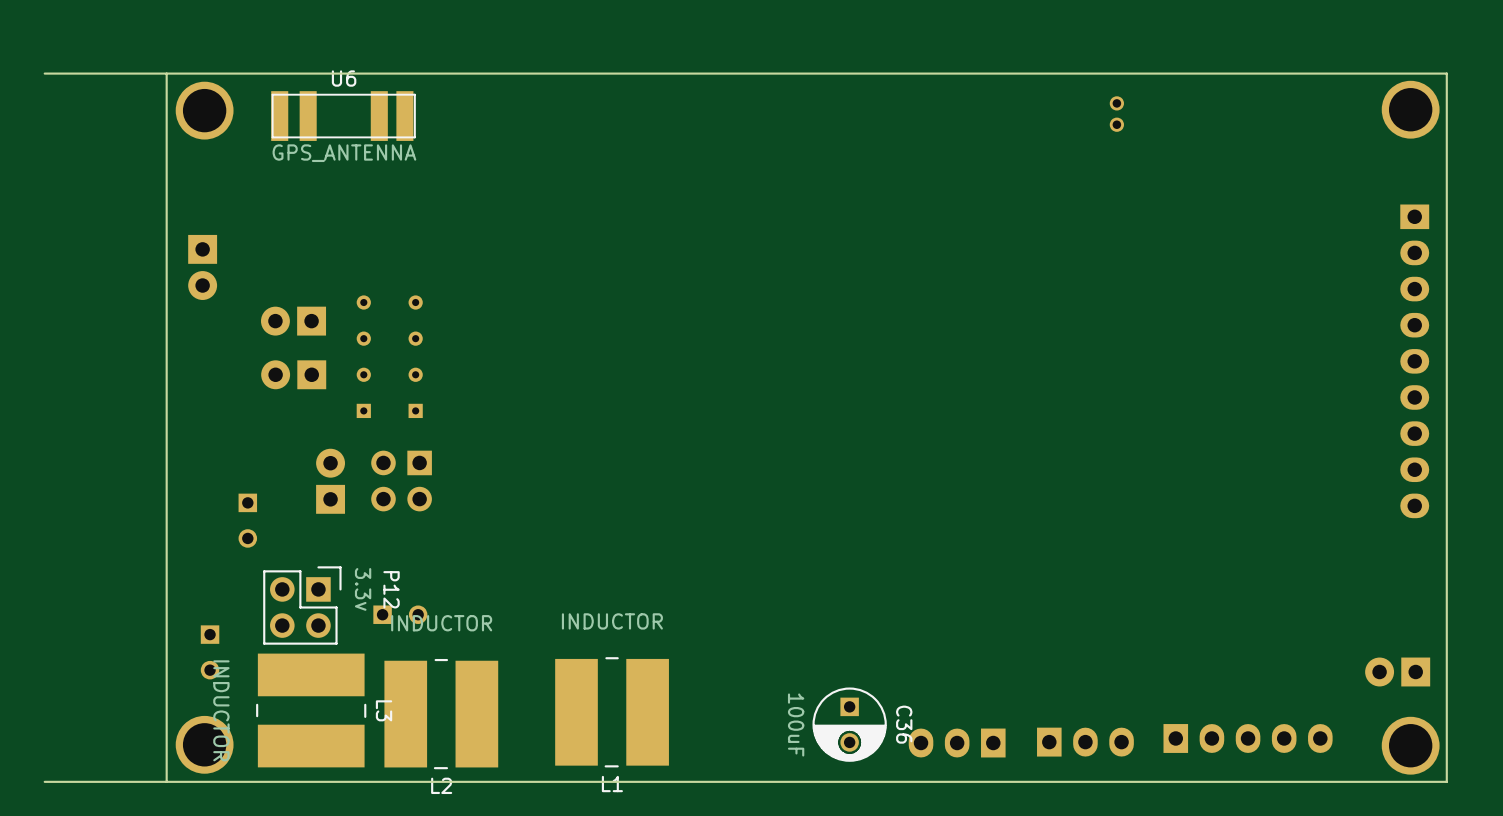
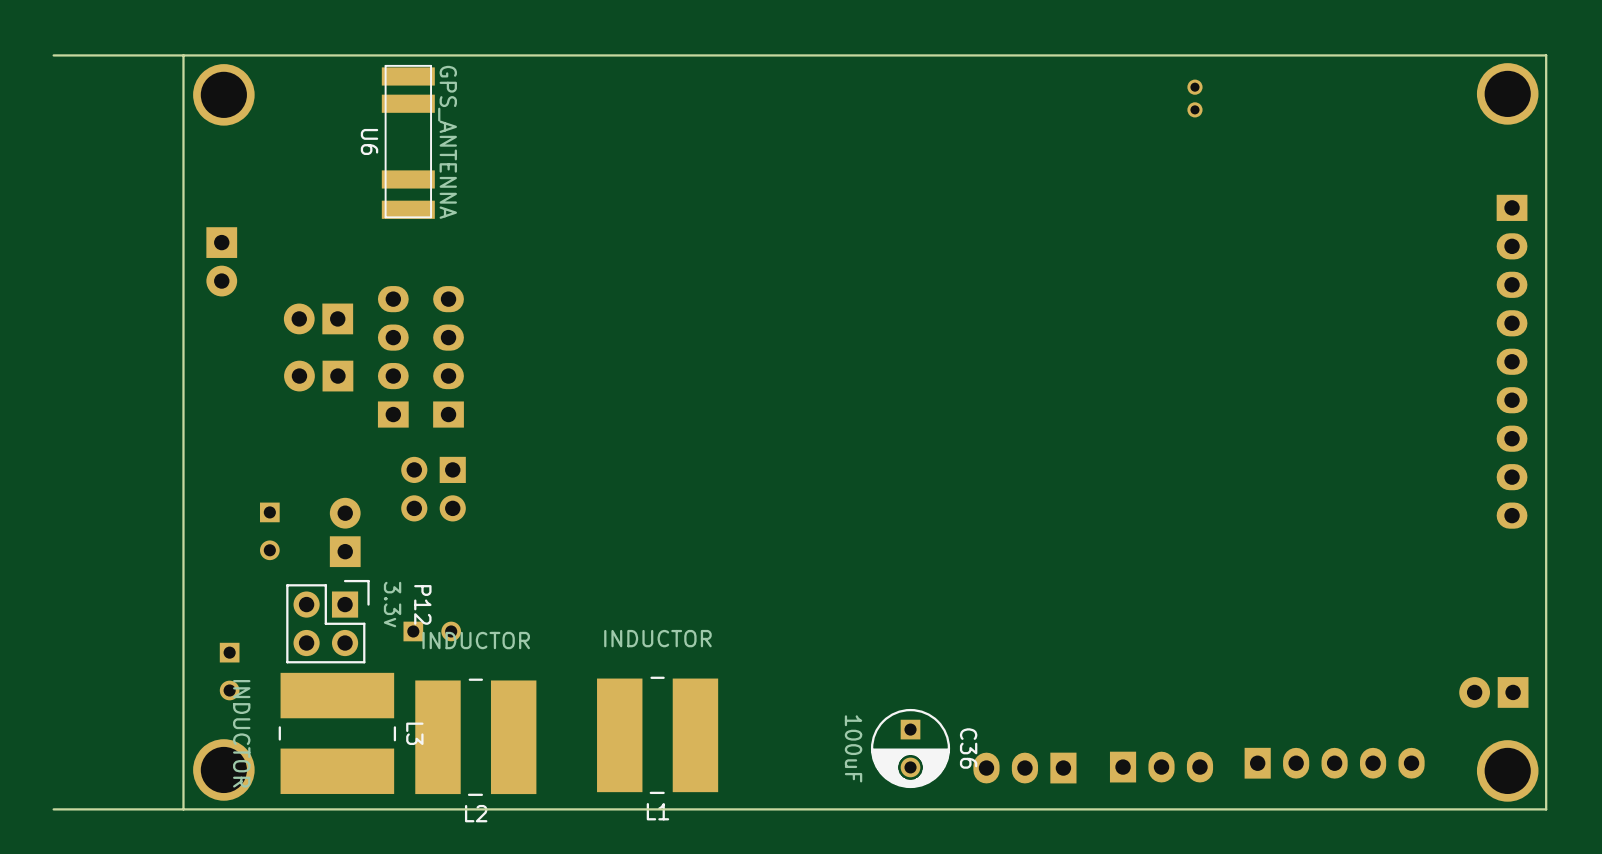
U6 rotation: 0° (343, 116) -> 90° counterclockwise (408, 142)
part footprint: [356, 295, 371, 419] -> [377, 286, 409, 428]
part footprint: [408, 295, 423, 419] -> [433, 286, 464, 428]
part position: (330, 481) -> (345, 532)

